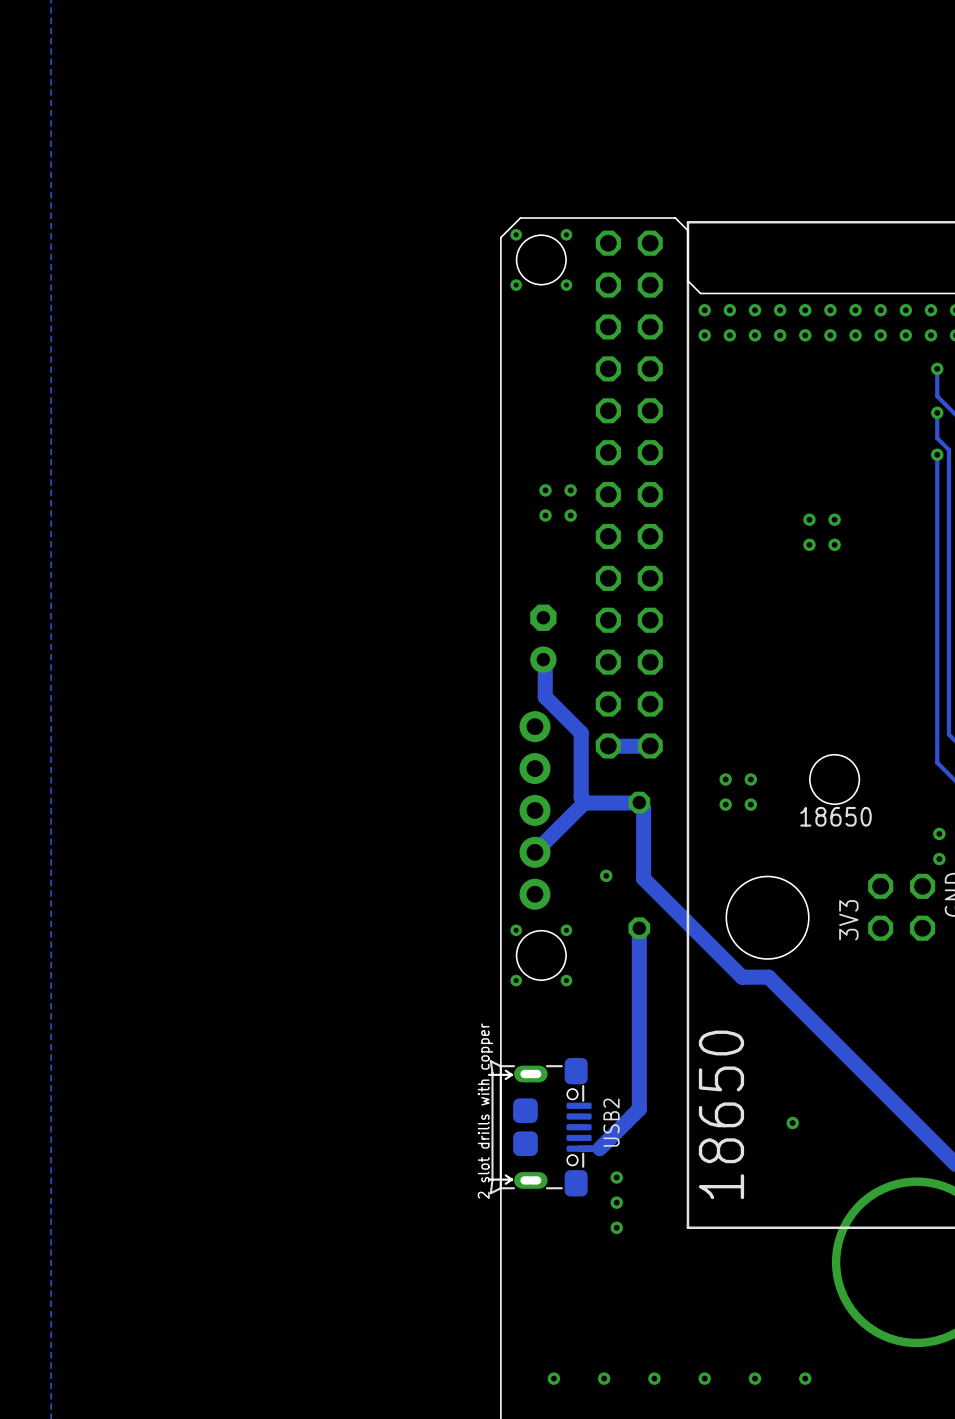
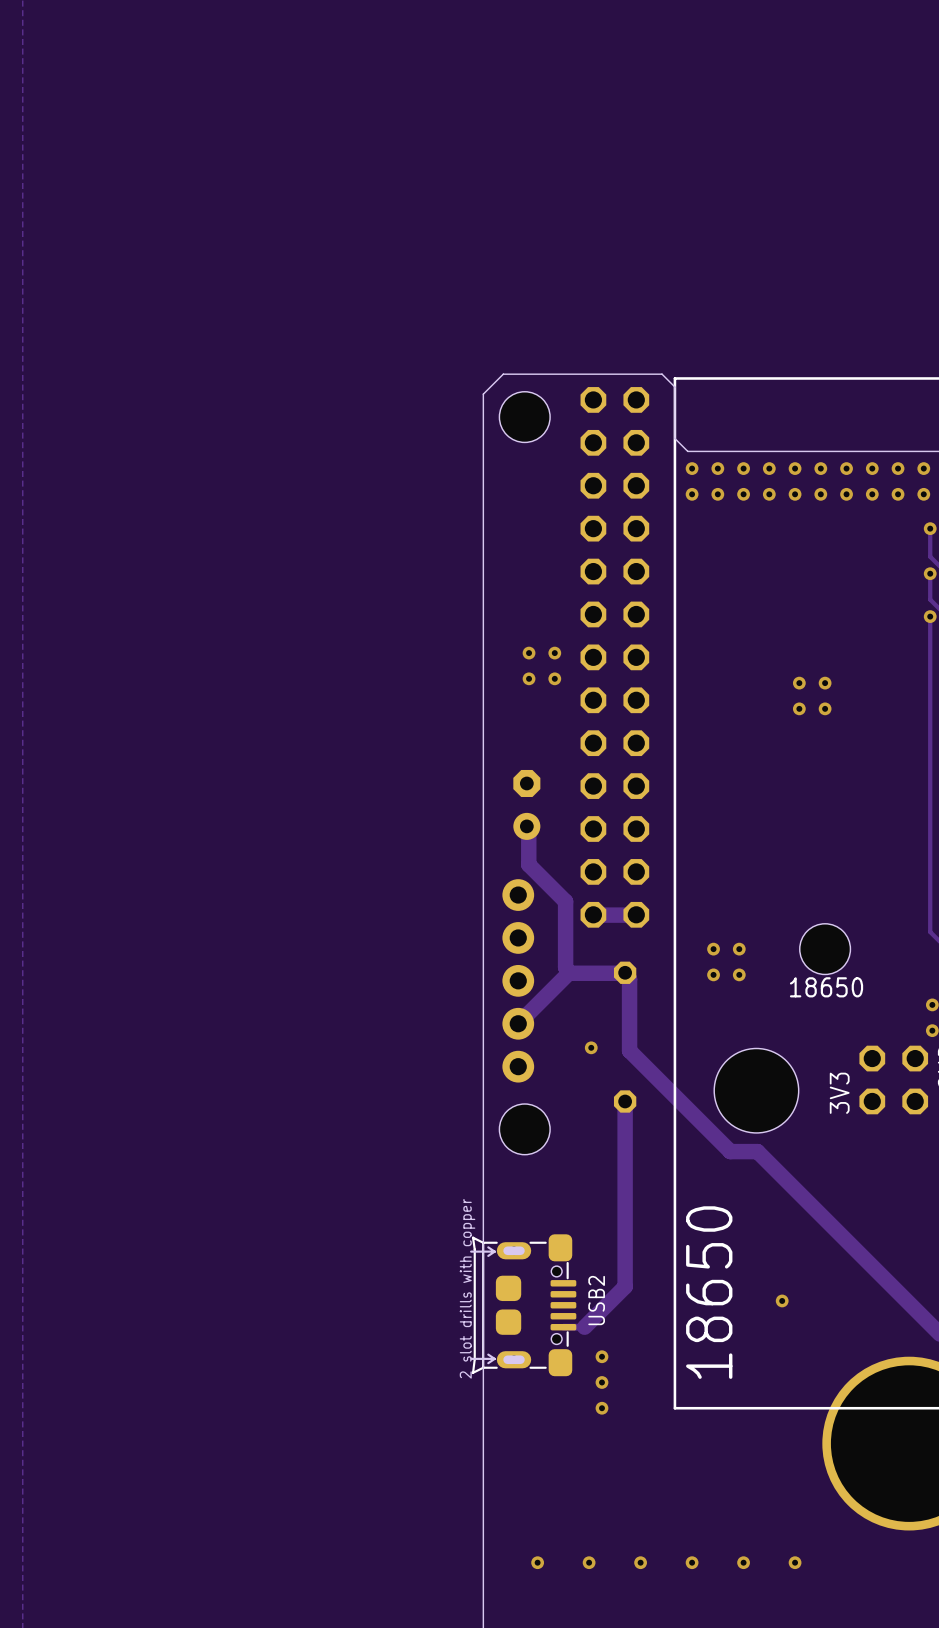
via: (516, 234) -> none
via: (566, 234) -> none
via: (516, 285) -> none
via: (566, 285) -> none
via: (516, 930) -> none
via: (566, 930) -> none
via: (516, 980) -> none
via: (566, 980) -> none

